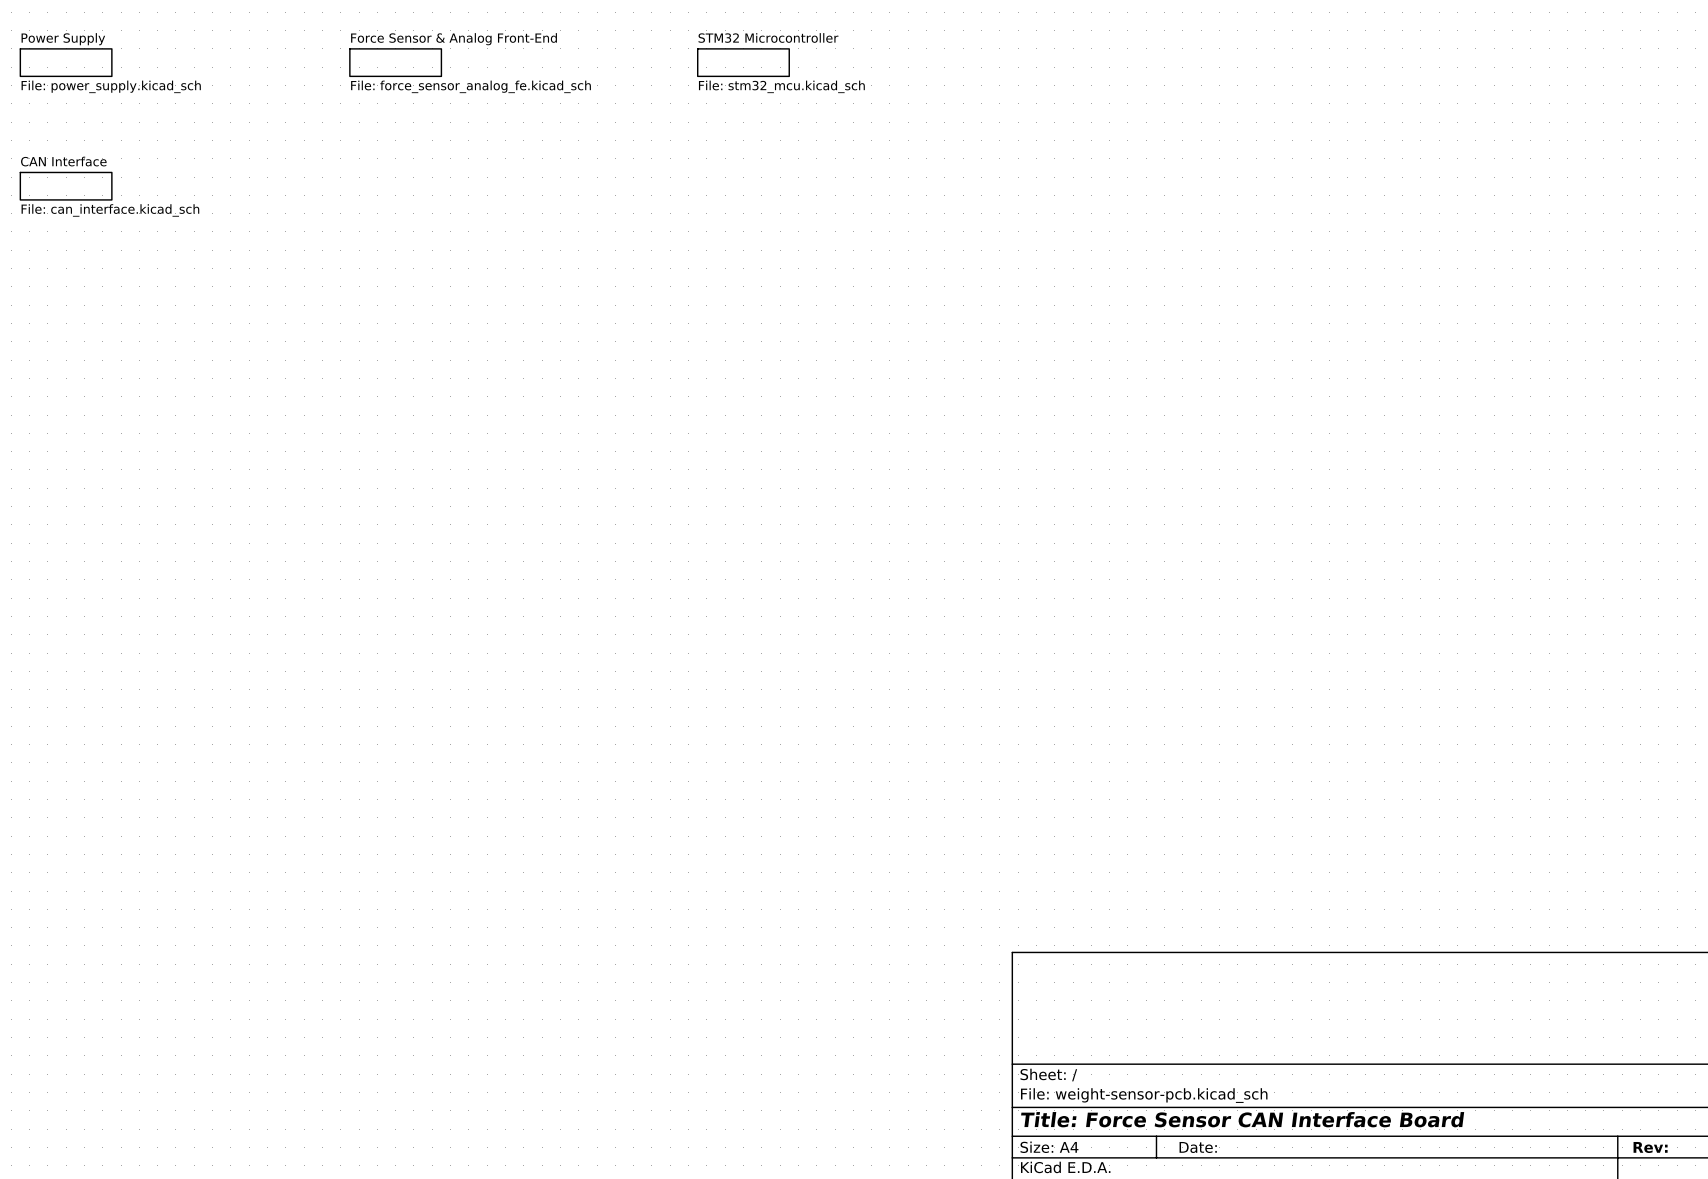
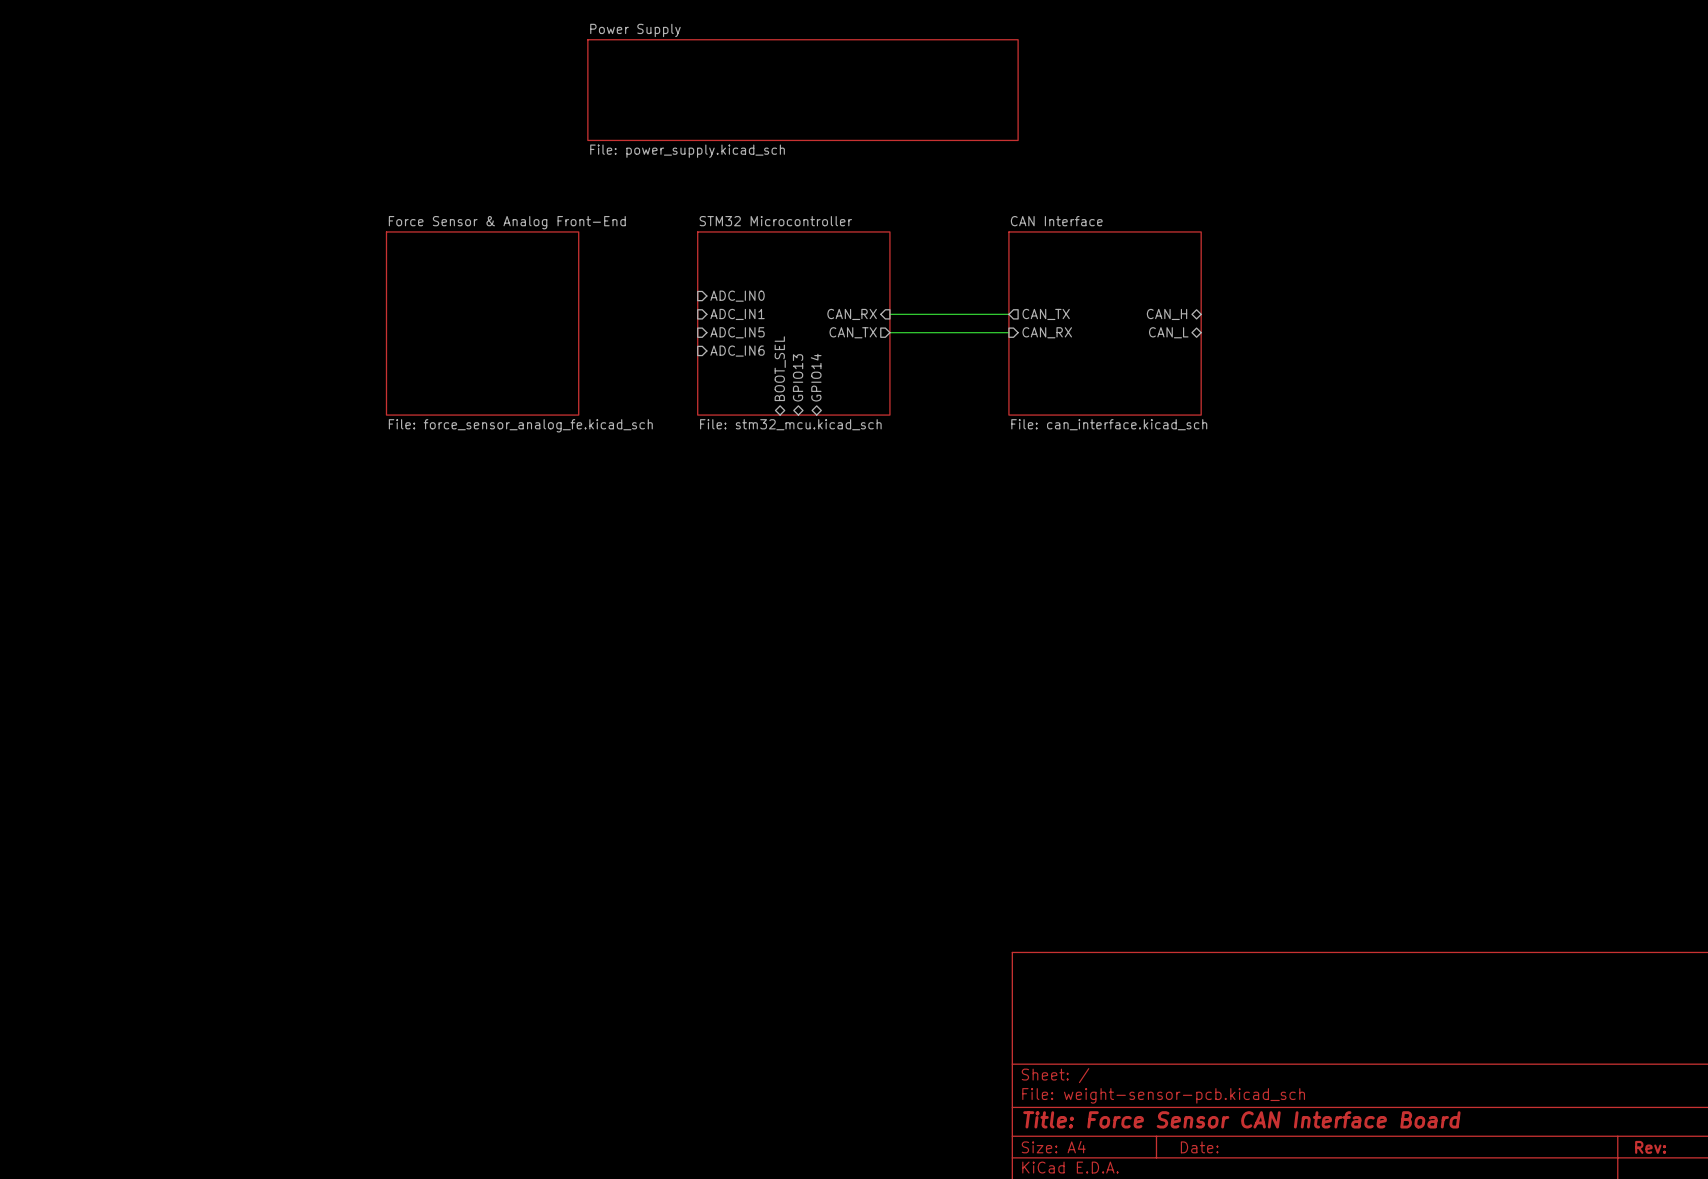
sheet STM32 Microcontroller name position: STM32 Microcontroller (768, 37) -> STM32 Microcontroller (775, 221)
sheet STM32 Microcontroller shape: [697, 48, 790, 77] -> [697, 231, 891, 416]
sheet Power Supply: File: power_supply.kicad_sch (66, 62) -> none
sheet Force Sensor & Analog Front-End: File: force_sensor_analog_fe.kicad_sch (395, 62) -> none
sheet STM32 Microcontroller value position: File: stm32_mcu.kicad_sch (781, 86) -> File: stm32_mcu.kicad_sch (790, 424)
sheet Power Supply: none -> File: power_supply.kicad_sch (802, 90)
sheet CAN Interface: File: can_interface.kicad_sch (66, 186) -> none
sheet pin: none -> ADC_IN0 (737, 296)
wire: none -> (889, 314) (1008, 314)
sheet pin: none -> ADC_IN1 (737, 314)
sheet pin: none -> CAN_RX (852, 314)
sheet pin: none -> CAN_TX (1046, 314)
sheet pin: none -> CAN_H (1167, 314)
sheet Force Sensor & Analog Front-End: none -> File: force_sensor_analog_fe.kicad_sch (482, 323)
sheet CAN Interface: none -> File: can_interface.kicad_sch (1105, 323)
wire: none -> (889, 332) (1008, 332)
sheet pin: none -> ADC_IN5 (737, 332)
sheet pin: none -> CAN_TX (853, 332)
sheet pin: none -> CAN_RX (1047, 332)
sheet pin: none -> CAN_L (1168, 332)
sheet pin: none -> ADC_IN6 (737, 351)
sheet pin: none -> BOOT_SEL (780, 368)
sheet pin: none -> GPIO14 (816, 377)
sheet pin: none -> GPIO13 (798, 377)

